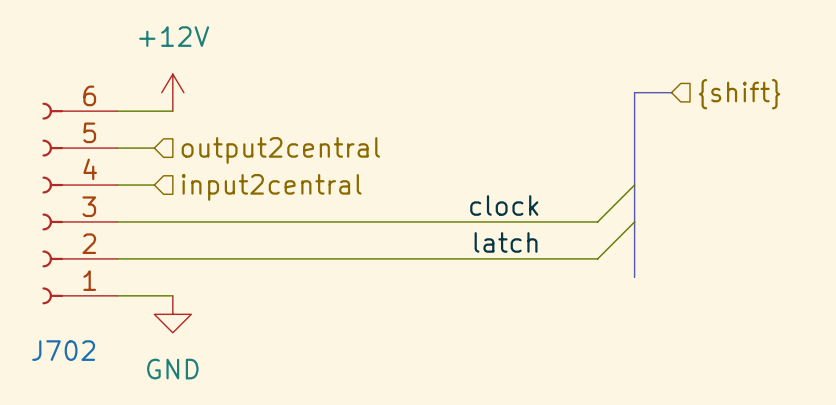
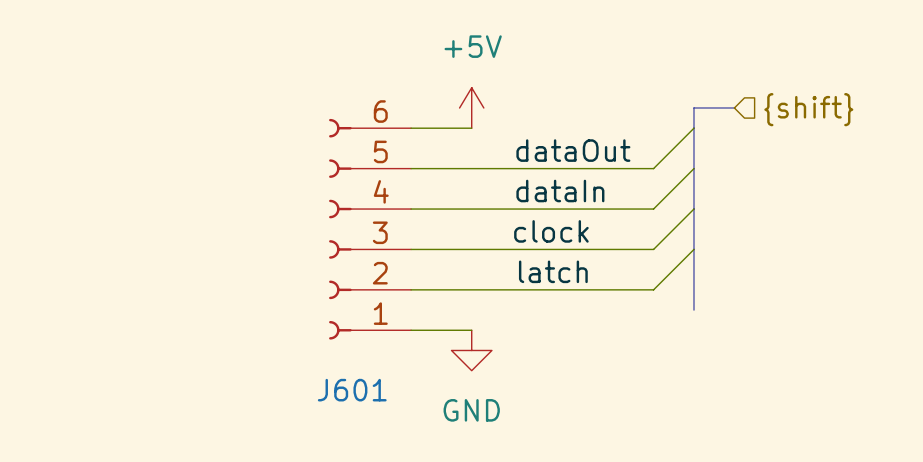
power symbol: +12V (172, 92) -> none
power symbol: none -> +5V (471, 107)
wire: (117, 111) (172, 111) -> (411, 128) (471, 128)
wire: none -> (693, 128) (653, 168) (411, 168)
label: none -> dataOut (573, 150)
wire: (117, 148) (154, 148) -> none
wire: none -> (693, 168) (653, 209) (411, 209)
hierarchical label: output2central (280, 150) -> none
label: none -> dataIn (560, 191)
wire: (117, 185) (154, 185) -> none
hierarchical label: input2central (271, 187) -> none
J702: (79, 203) -> none
J601: none -> (370, 229)
wire: (117, 221) (376, 221) -> none
wire: (117, 258) (376, 258) -> none
wire: (117, 295) (172, 295) -> (411, 330) (471, 330)
power symbol position: GND (172, 314) -> GND (471, 350)

